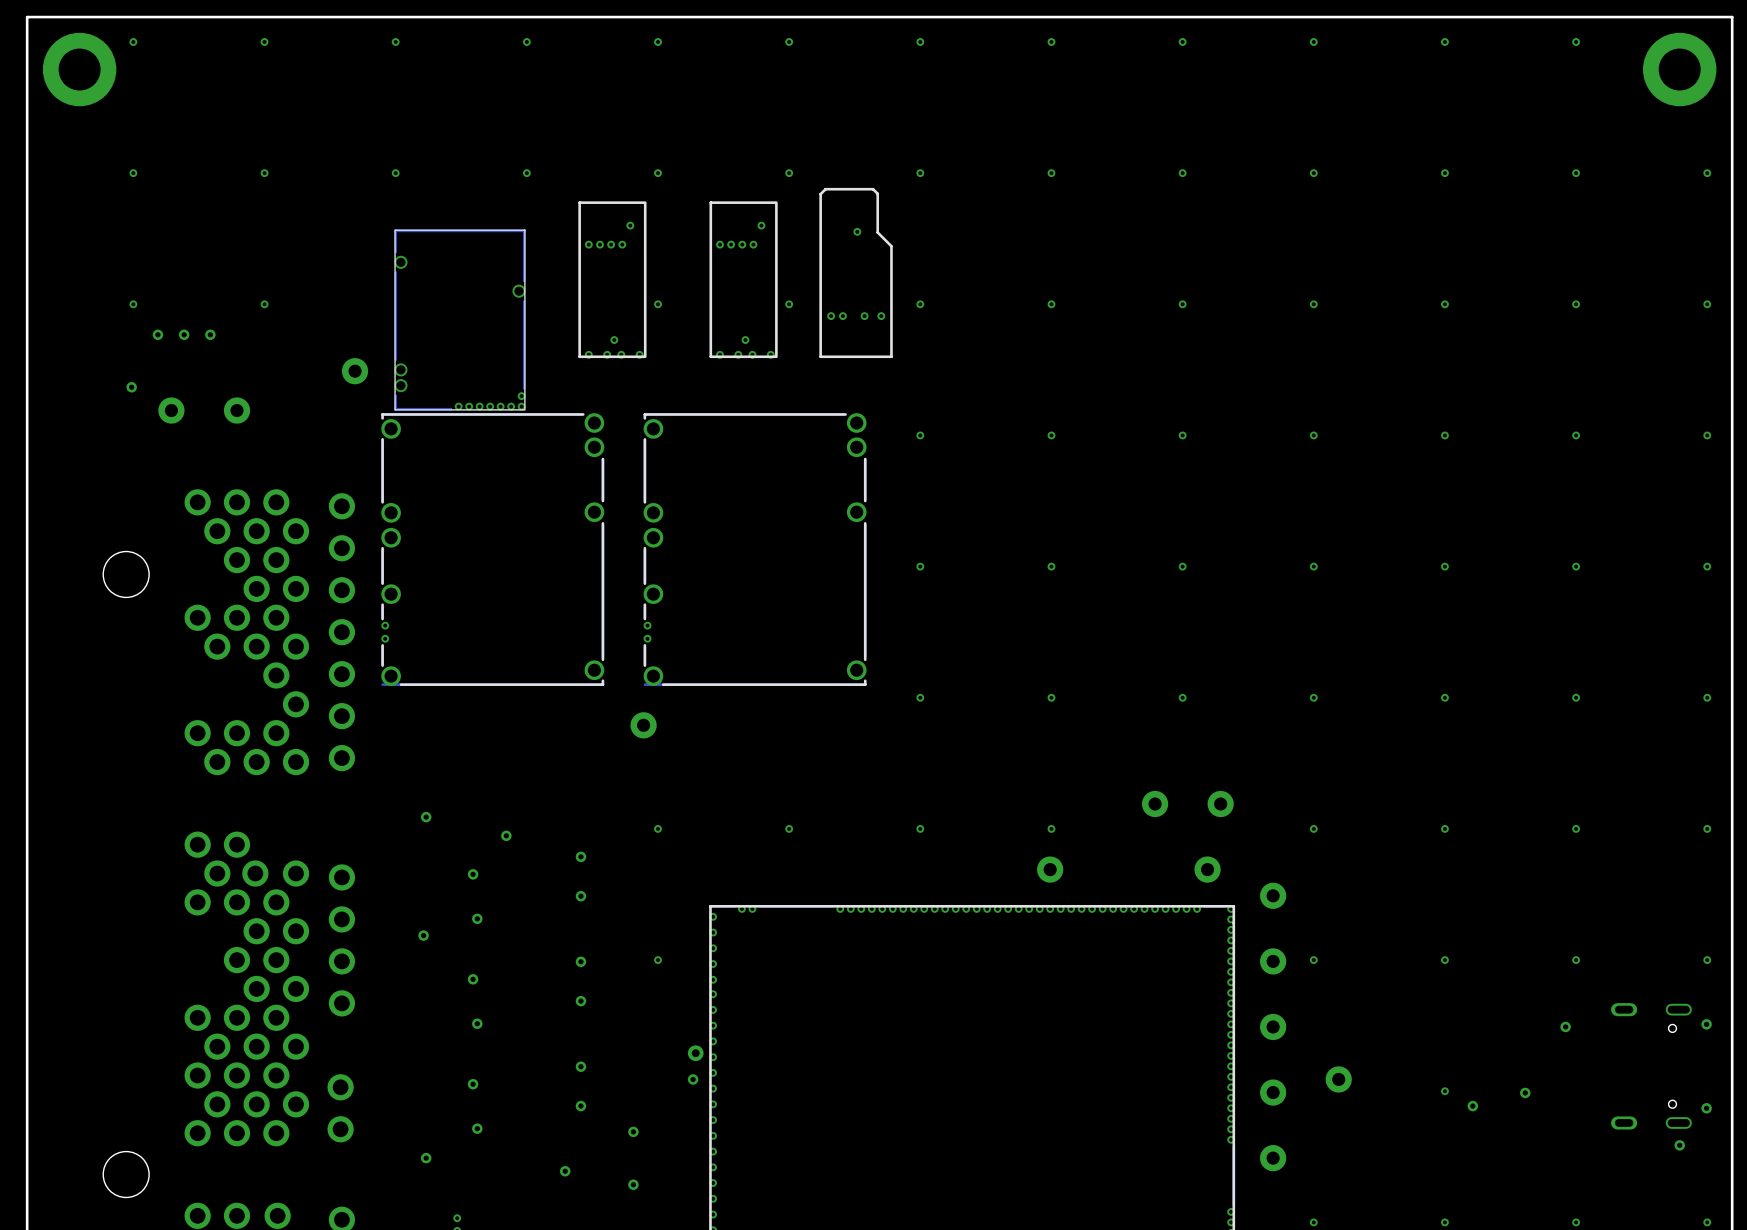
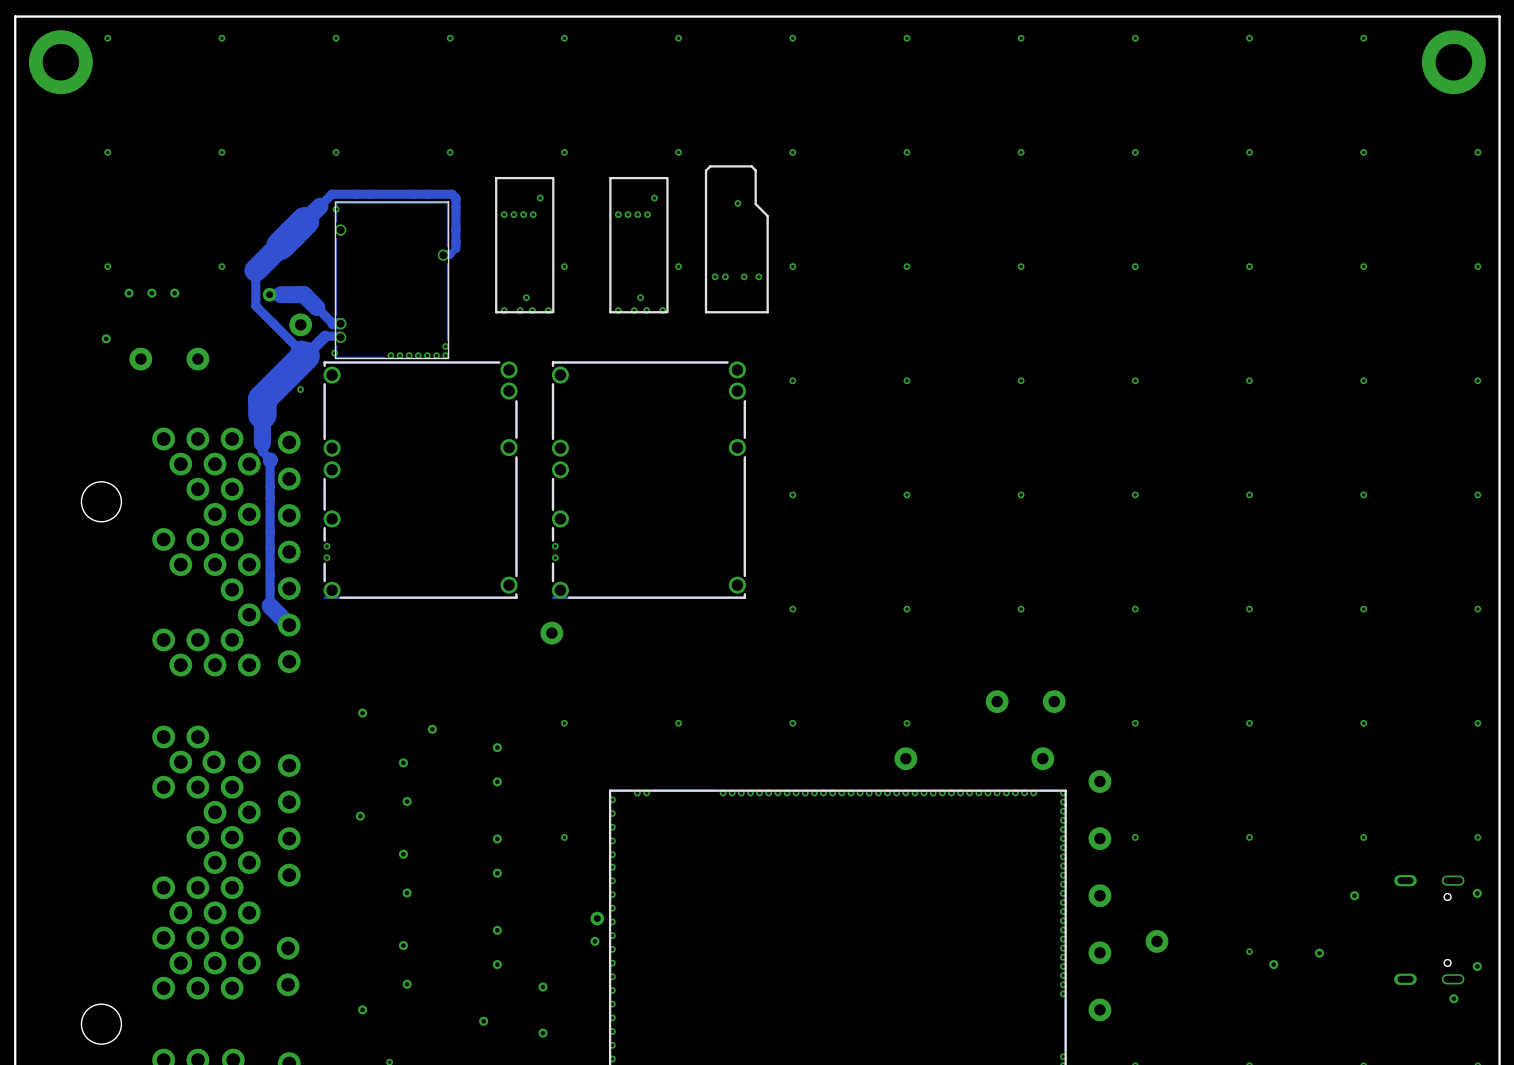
via: none -> (336, 209)
track: none -> (443, 255) (449, 254) (455, 248) (455, 198) (451, 194) (332, 194) (255, 270) (255, 306) (305, 355)
track: none -> (269, 294) (303, 294) (332, 323) (340, 323)
via: none -> (269, 294)
track: none -> (340, 337) (325, 336) (305, 355)
via: none -> (334, 353)
track: none -> (305, 355) (262, 399) (262, 451) (270, 459) (270, 605) (289, 625)
via: none -> (300, 389)

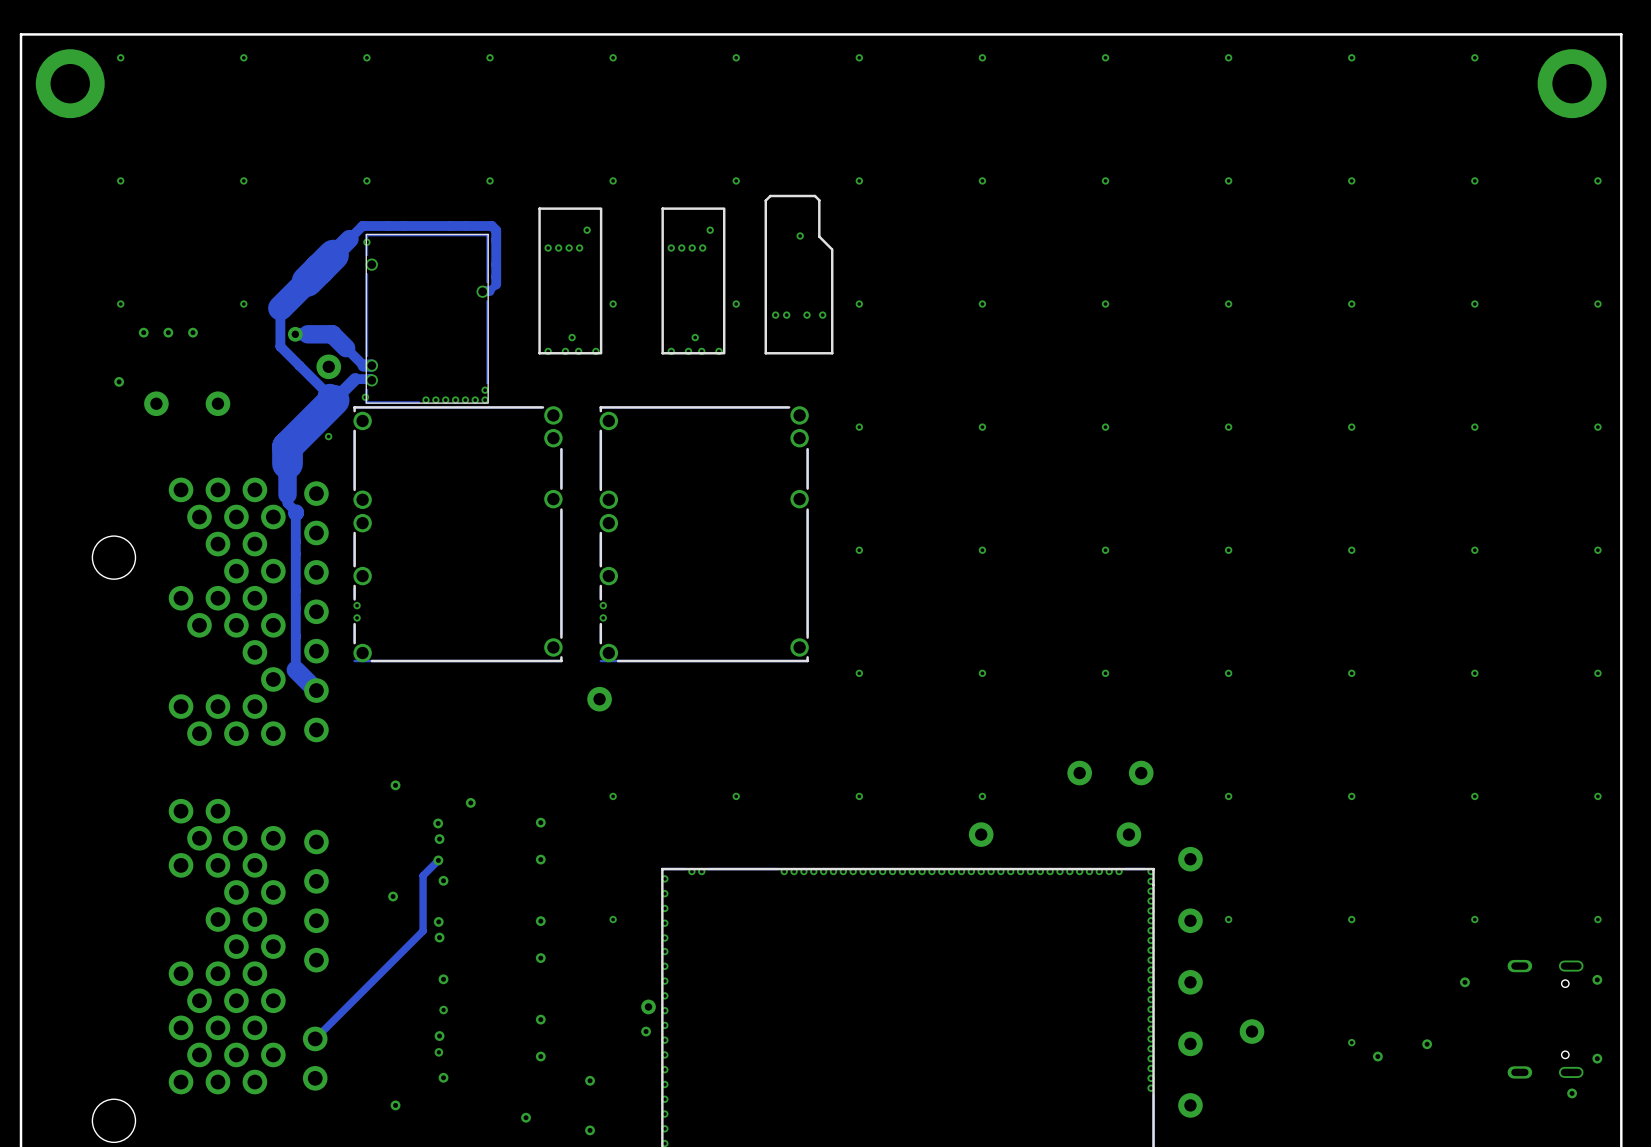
via: none -> (438, 823)
track: none -> (438, 860) (423, 875) (423, 931) (315, 1038)
via: none -> (438, 860)
via: none -> (438, 921)
via: none -> (443, 1010)
via: none -> (438, 1052)

